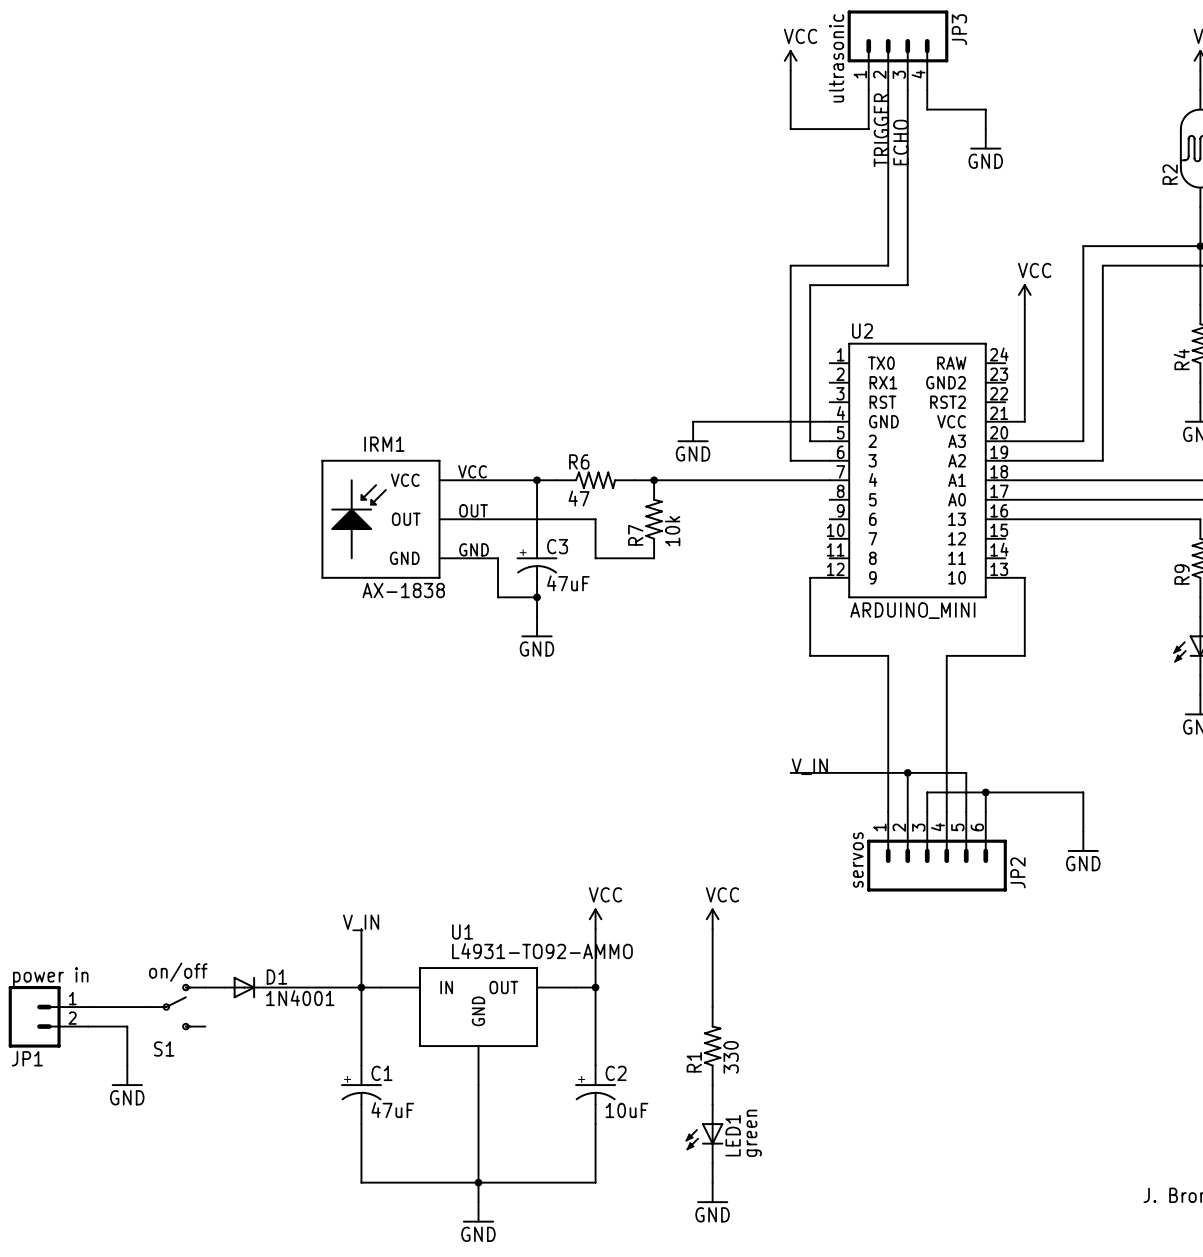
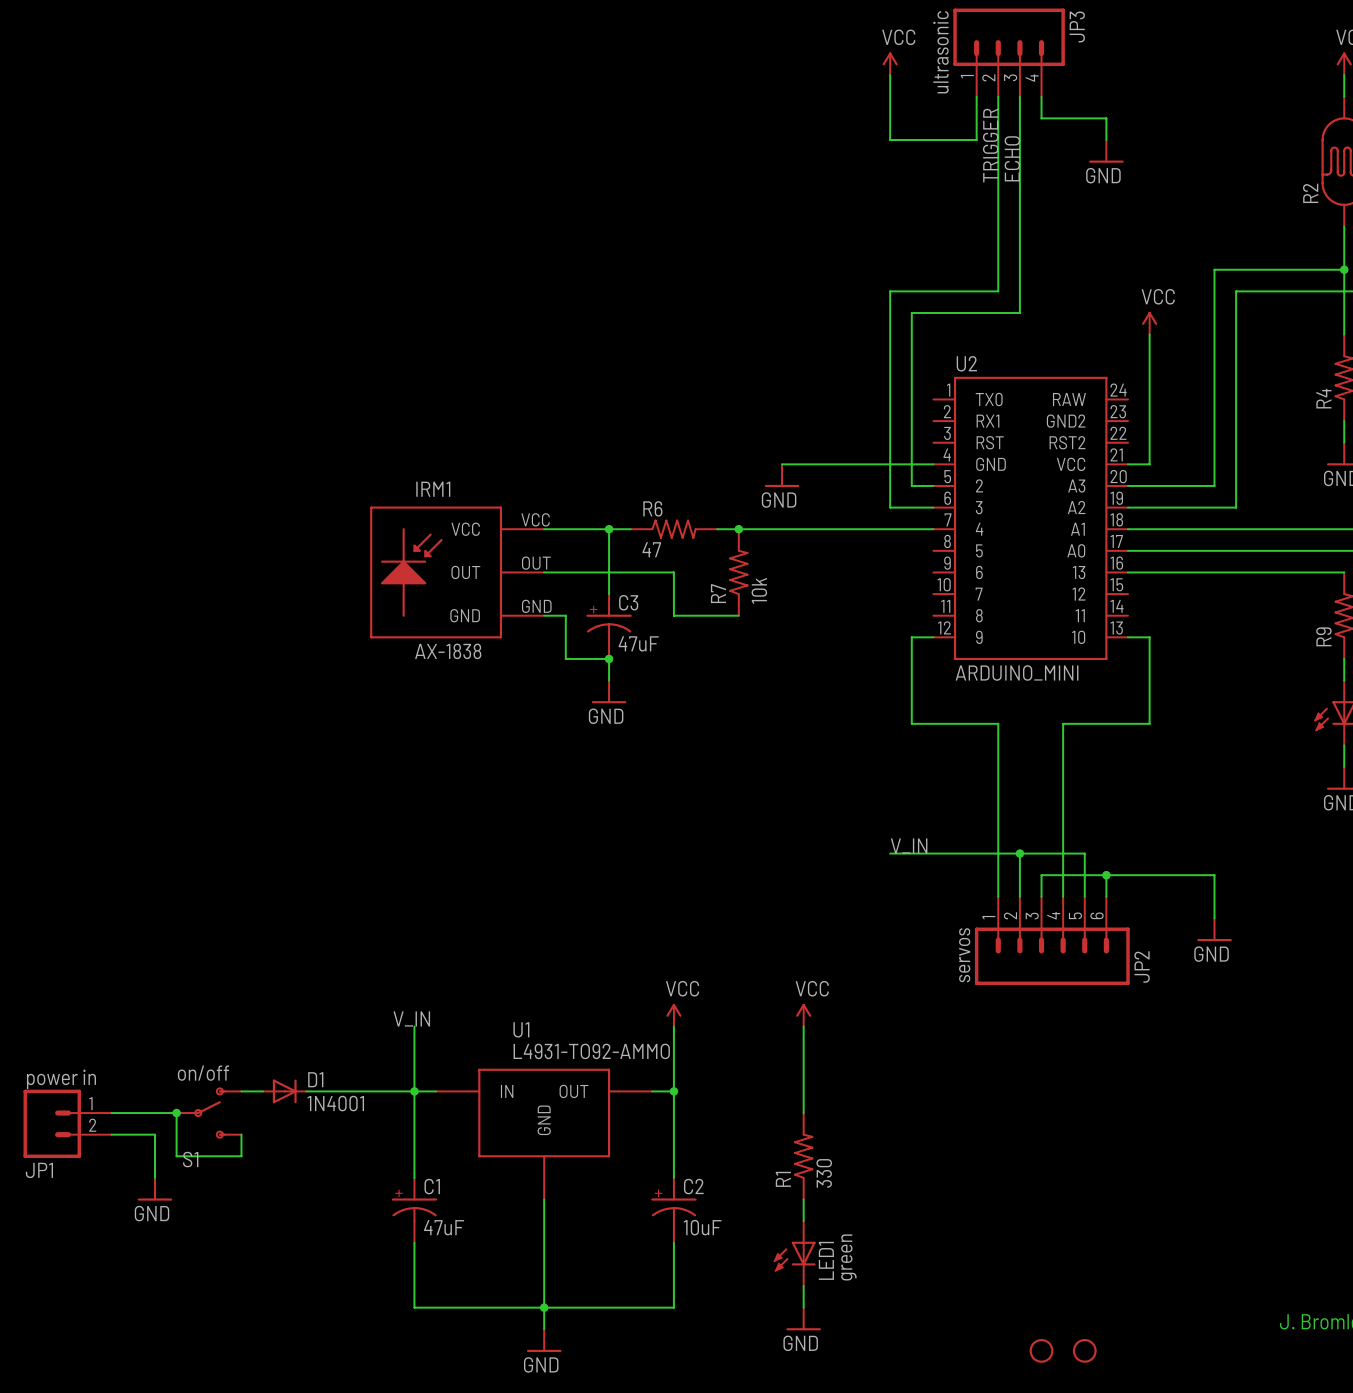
wire: none -> (176, 1113) (176, 1156) (241, 1156) (241, 1134)
junction: none -> (176, 1113)
part: none -> (1041, 1350)
part: none -> (1084, 1350)

